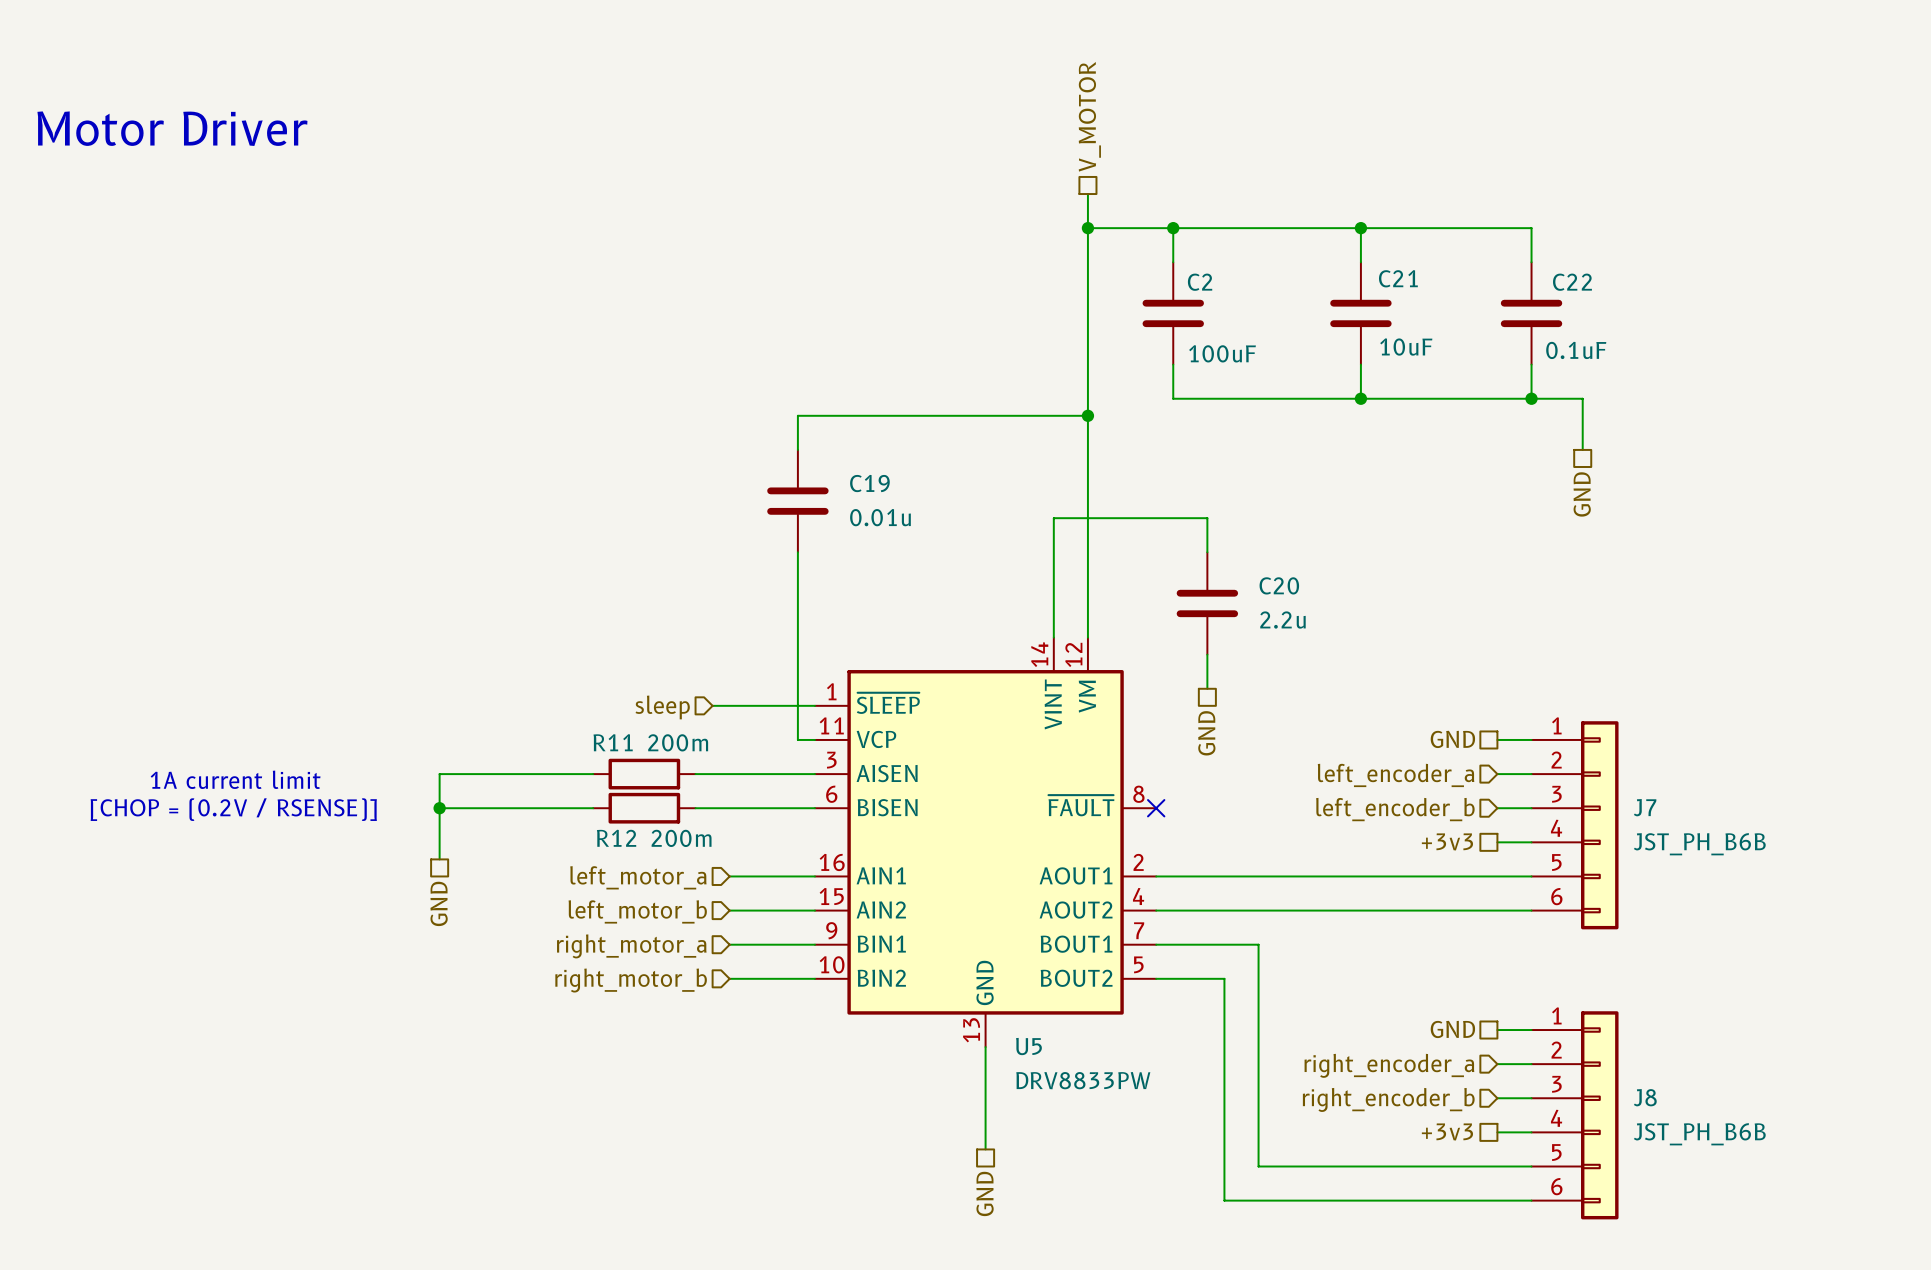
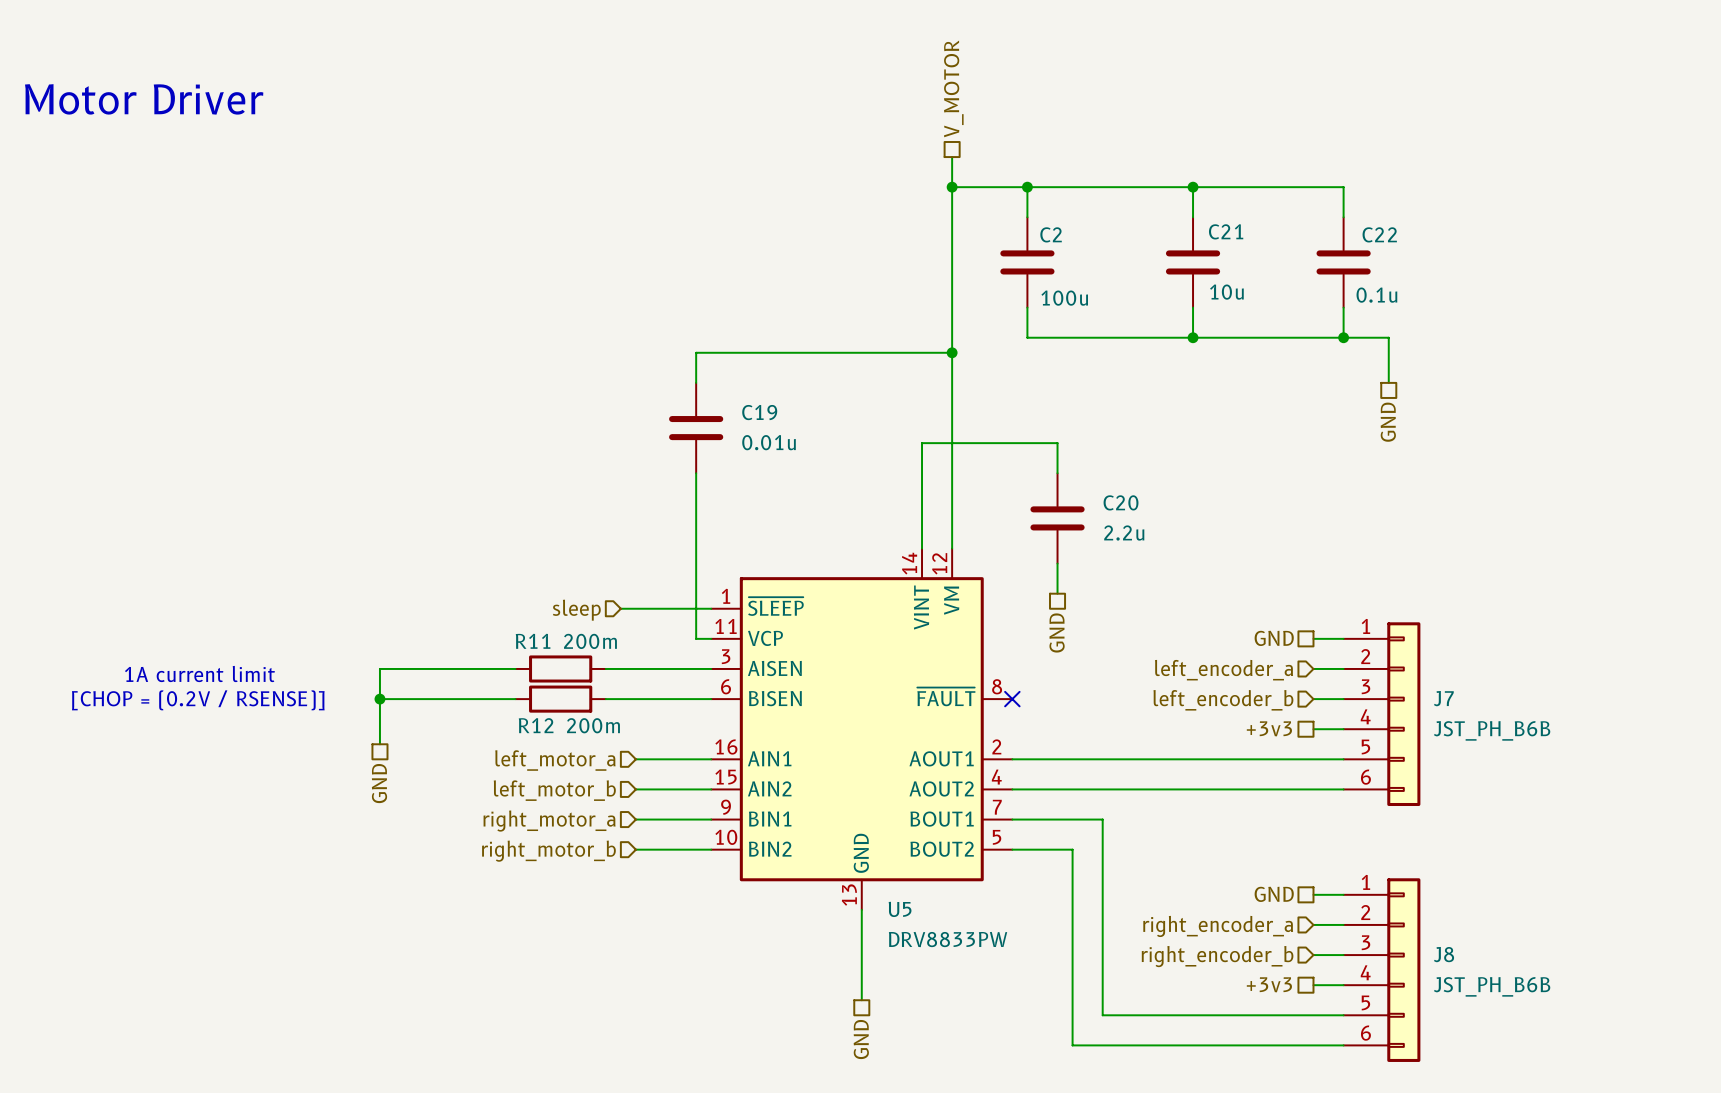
C21 value: 10uF (1406, 347) -> 10u (1226, 292)
C22 value: 0.1uF (1576, 350) -> 0.1u (1376, 295)
C2 value: 100uF (1222, 353) -> 100u (1064, 298)

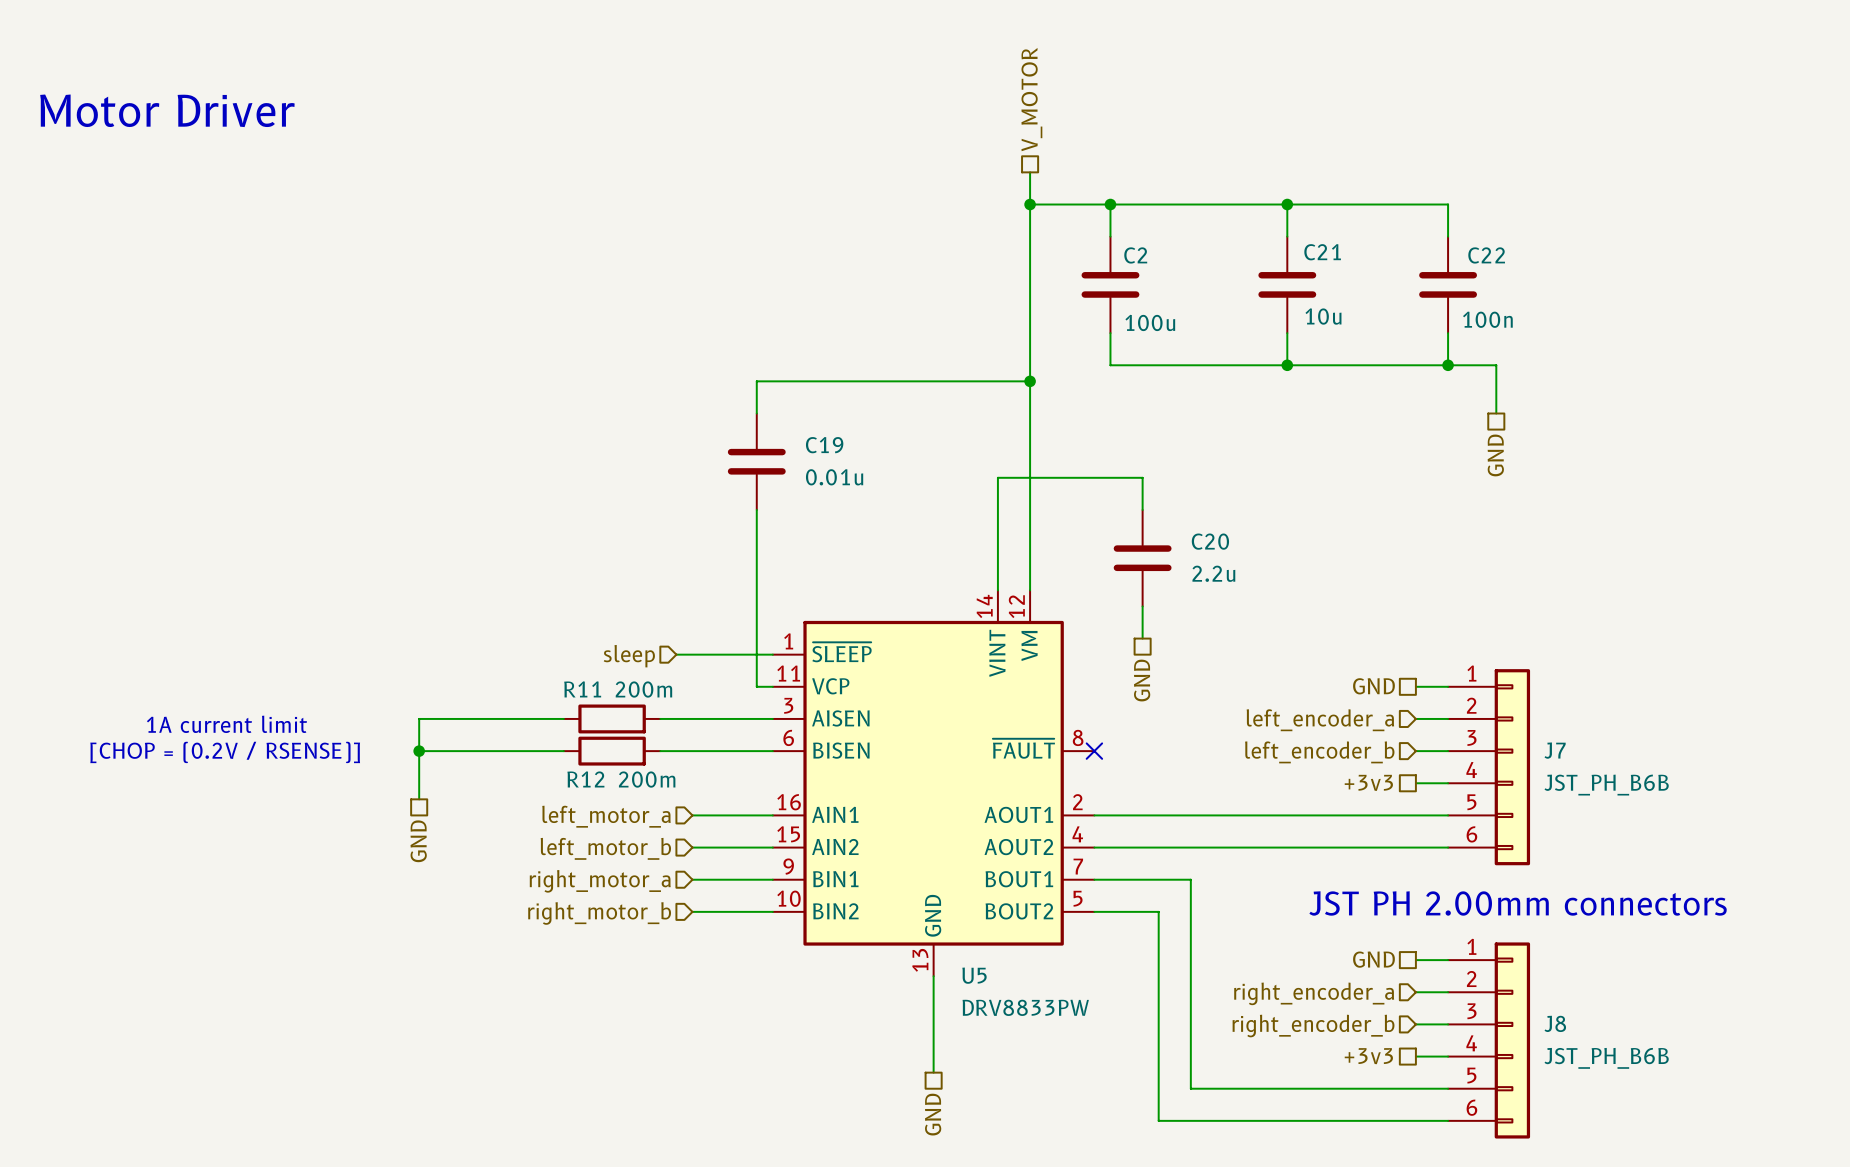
C22 value: 0.1u (1376, 295) -> 100n (1487, 319)
text: none -> JST PH 2.00mm connectors (1518, 903)

